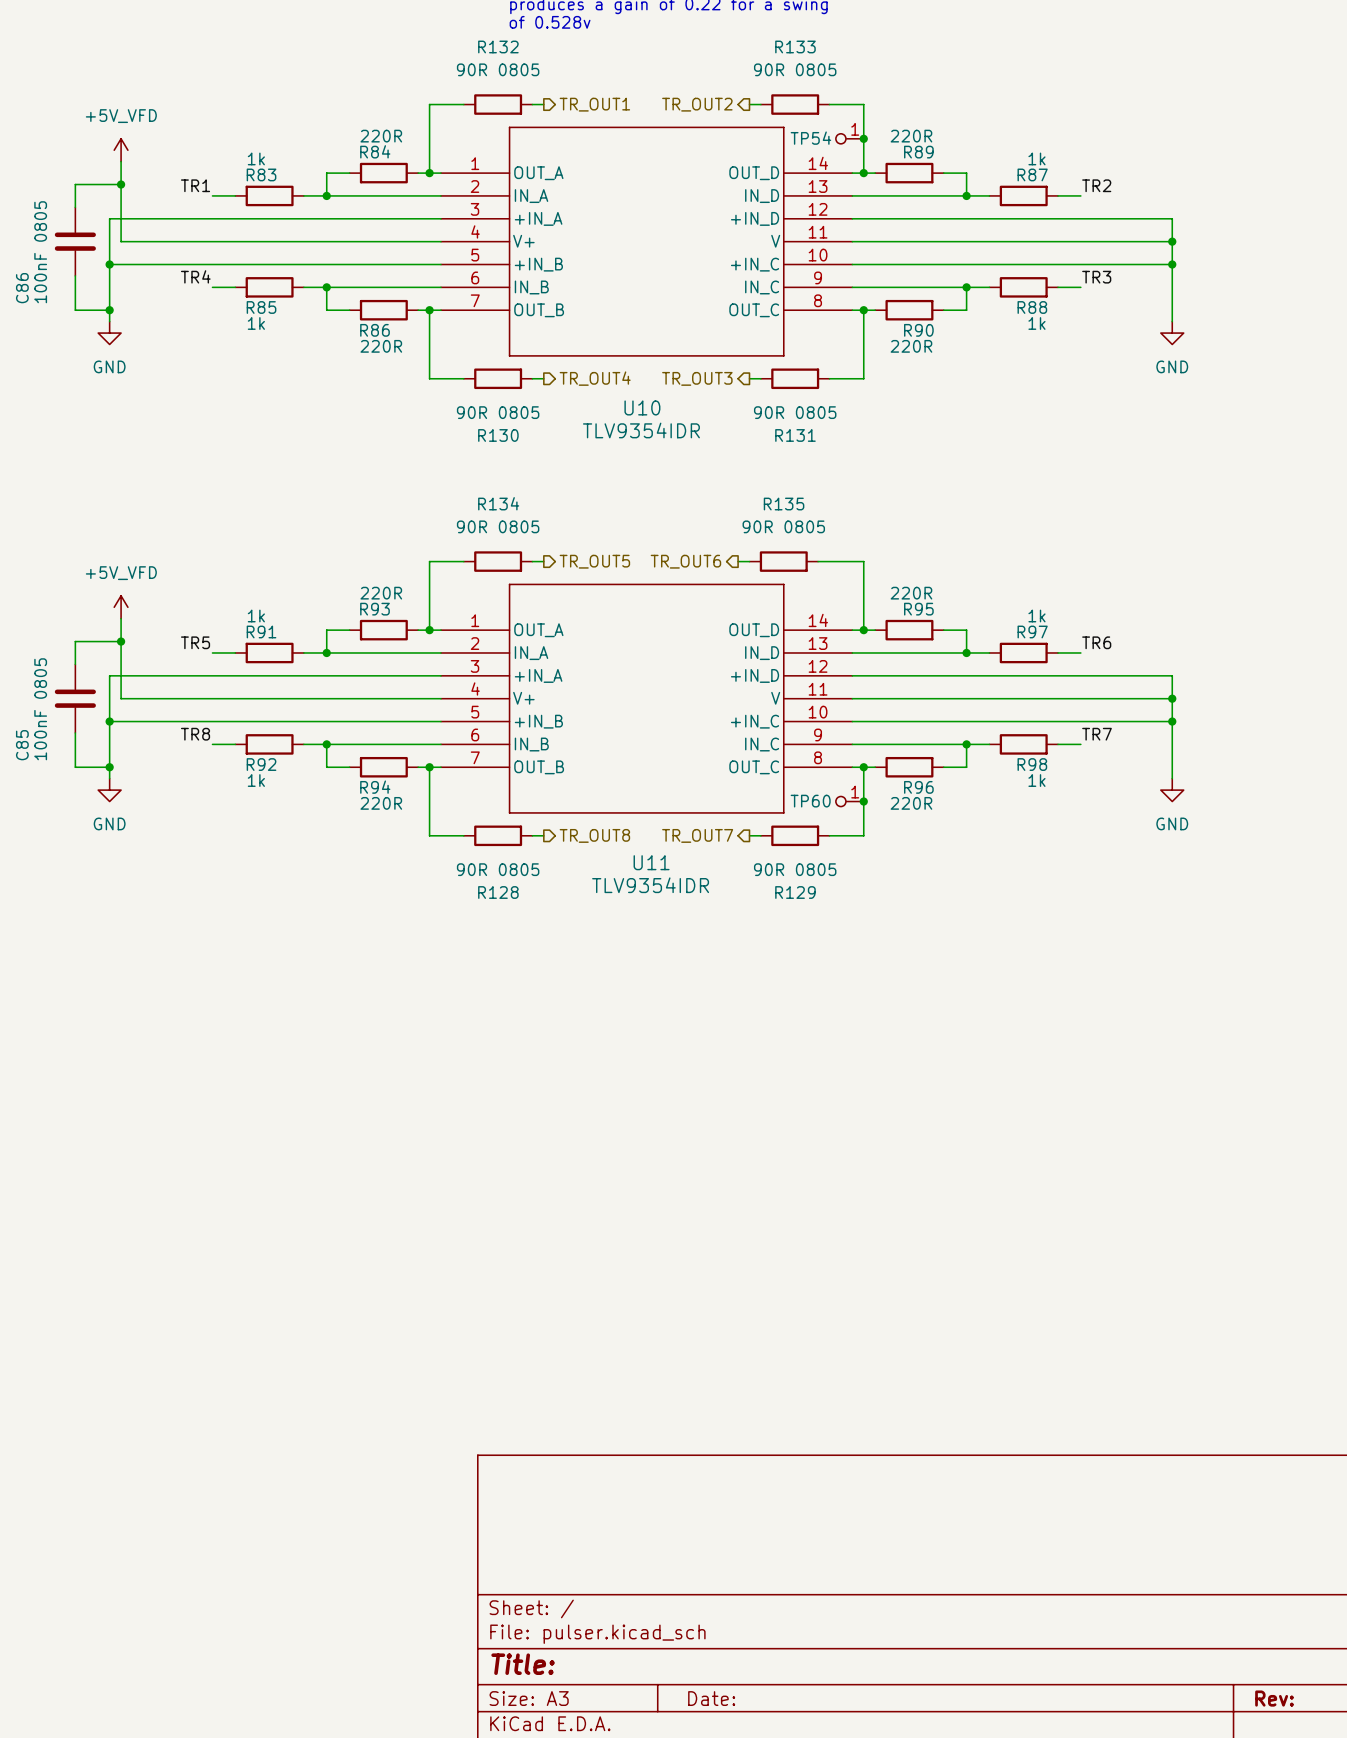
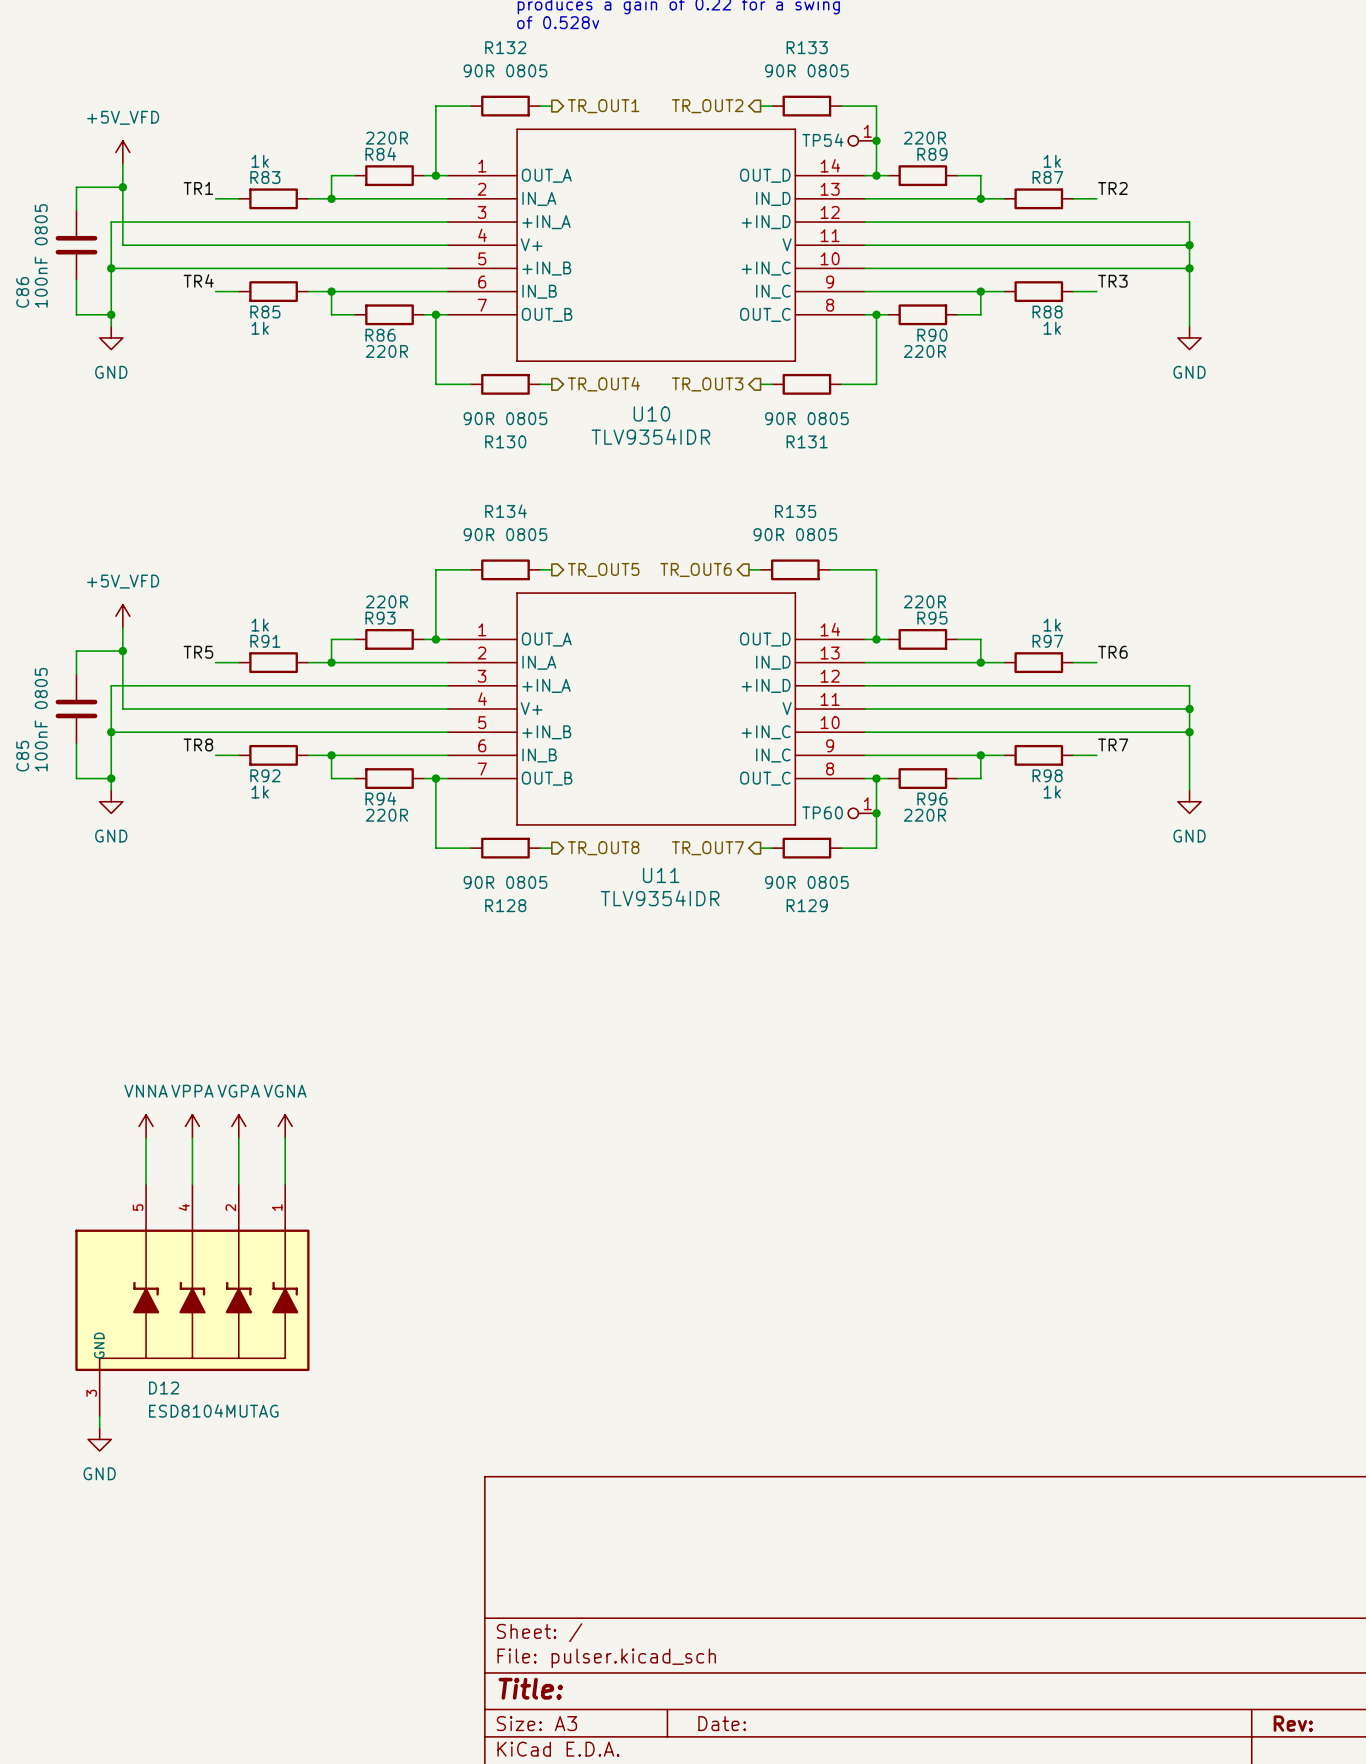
power symbol: none -> VNNA (146, 1126)
power symbol: none -> VPPA (192, 1126)
power symbol: none -> VGPA (238, 1126)
power symbol: none -> VGNA (285, 1126)
wire: none -> (146, 1137) (146, 1184)
wire: none -> (192, 1137) (192, 1184)
wire: none -> (238, 1137) (238, 1184)
wire: none -> (285, 1137) (285, 1184)
D12: none -> ESD8104MUTAG (192, 1300)
wire: none -> (99, 1416) (99, 1427)
power symbol: none -> GND (99, 1439)

